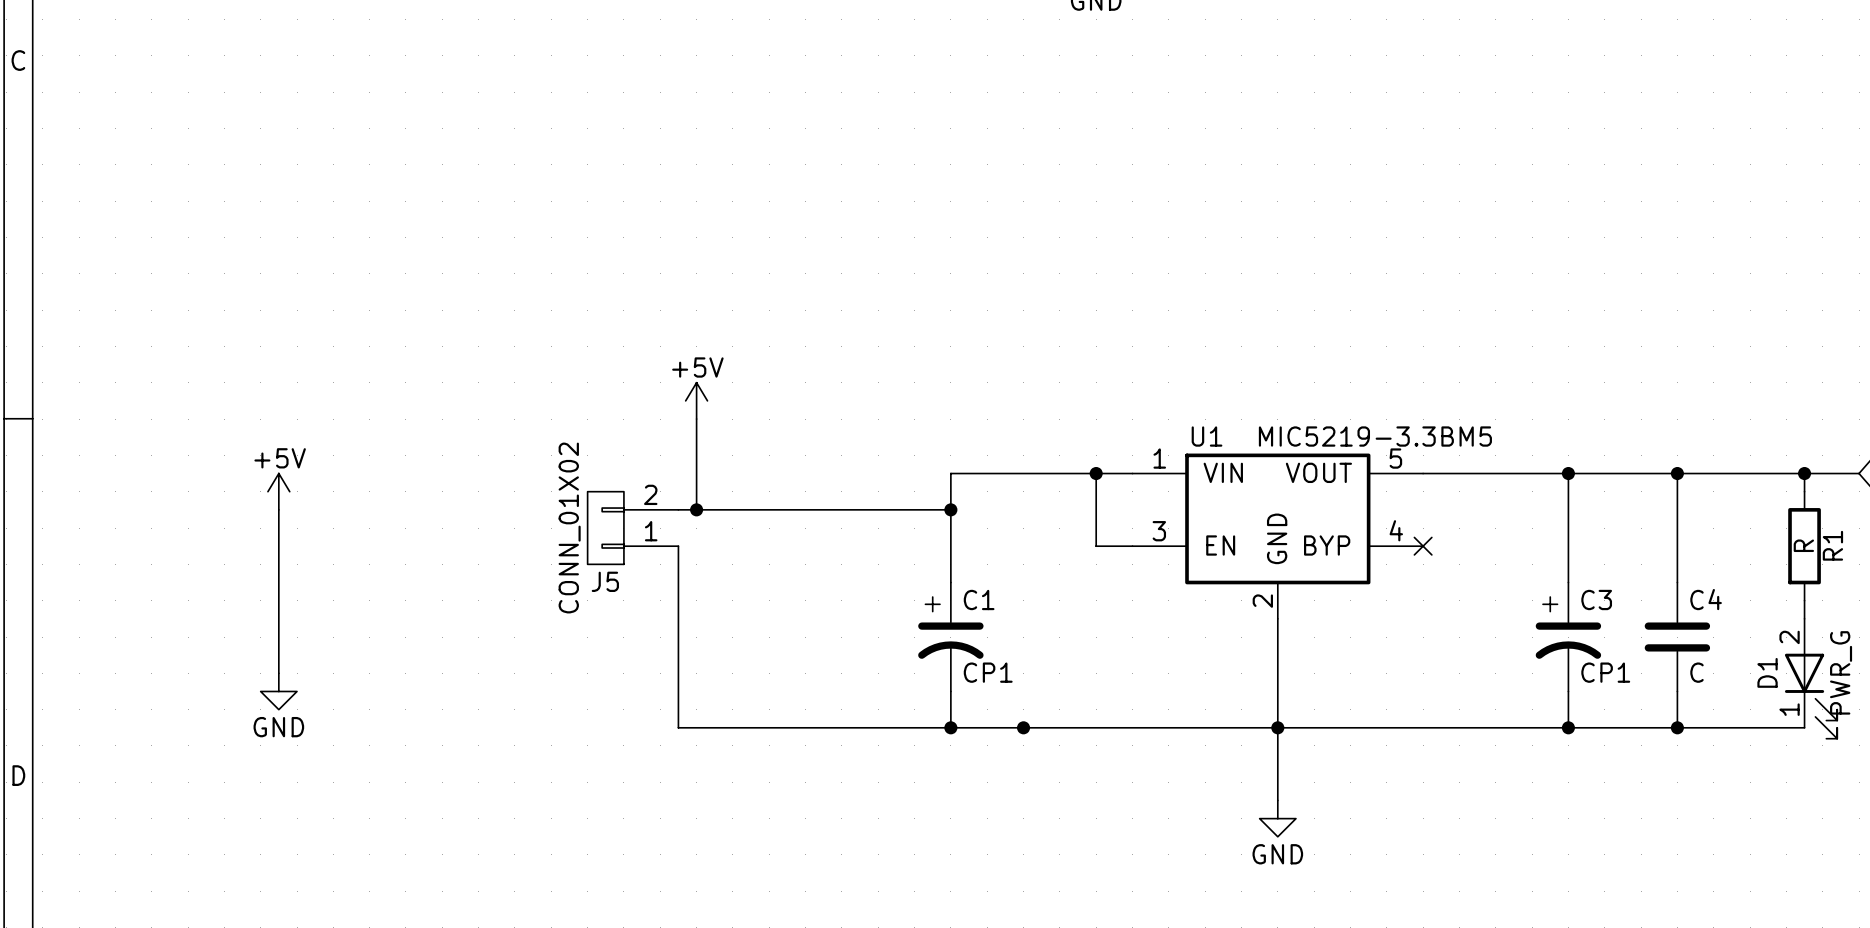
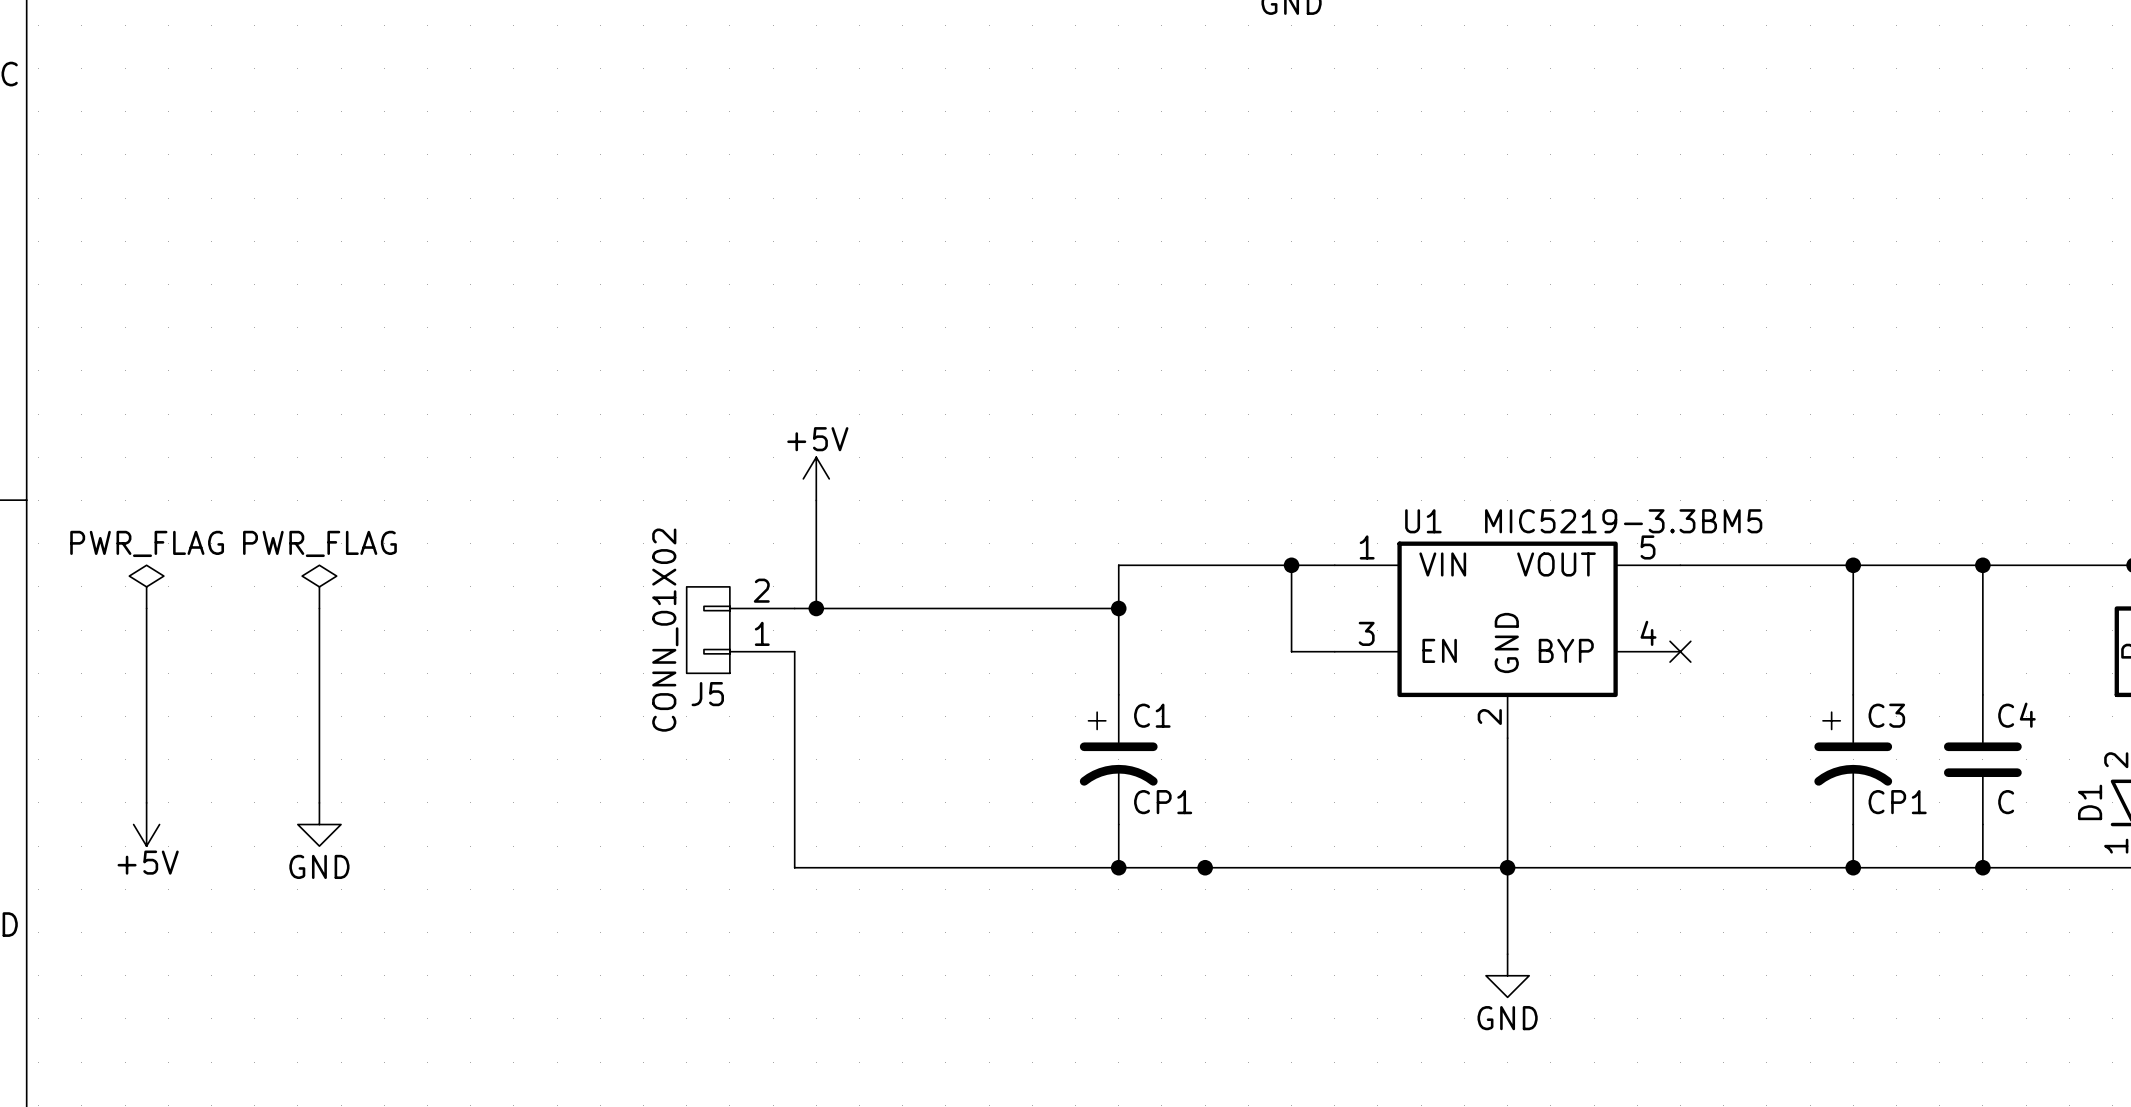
power symbol: none -> PWR_FLAG (146, 586)
power symbol: +5V (278, 491) -> PWR_FLAG (319, 586)
wire: none -> (146, 608) (146, 802)
power symbol: none -> +5V (146, 824)

